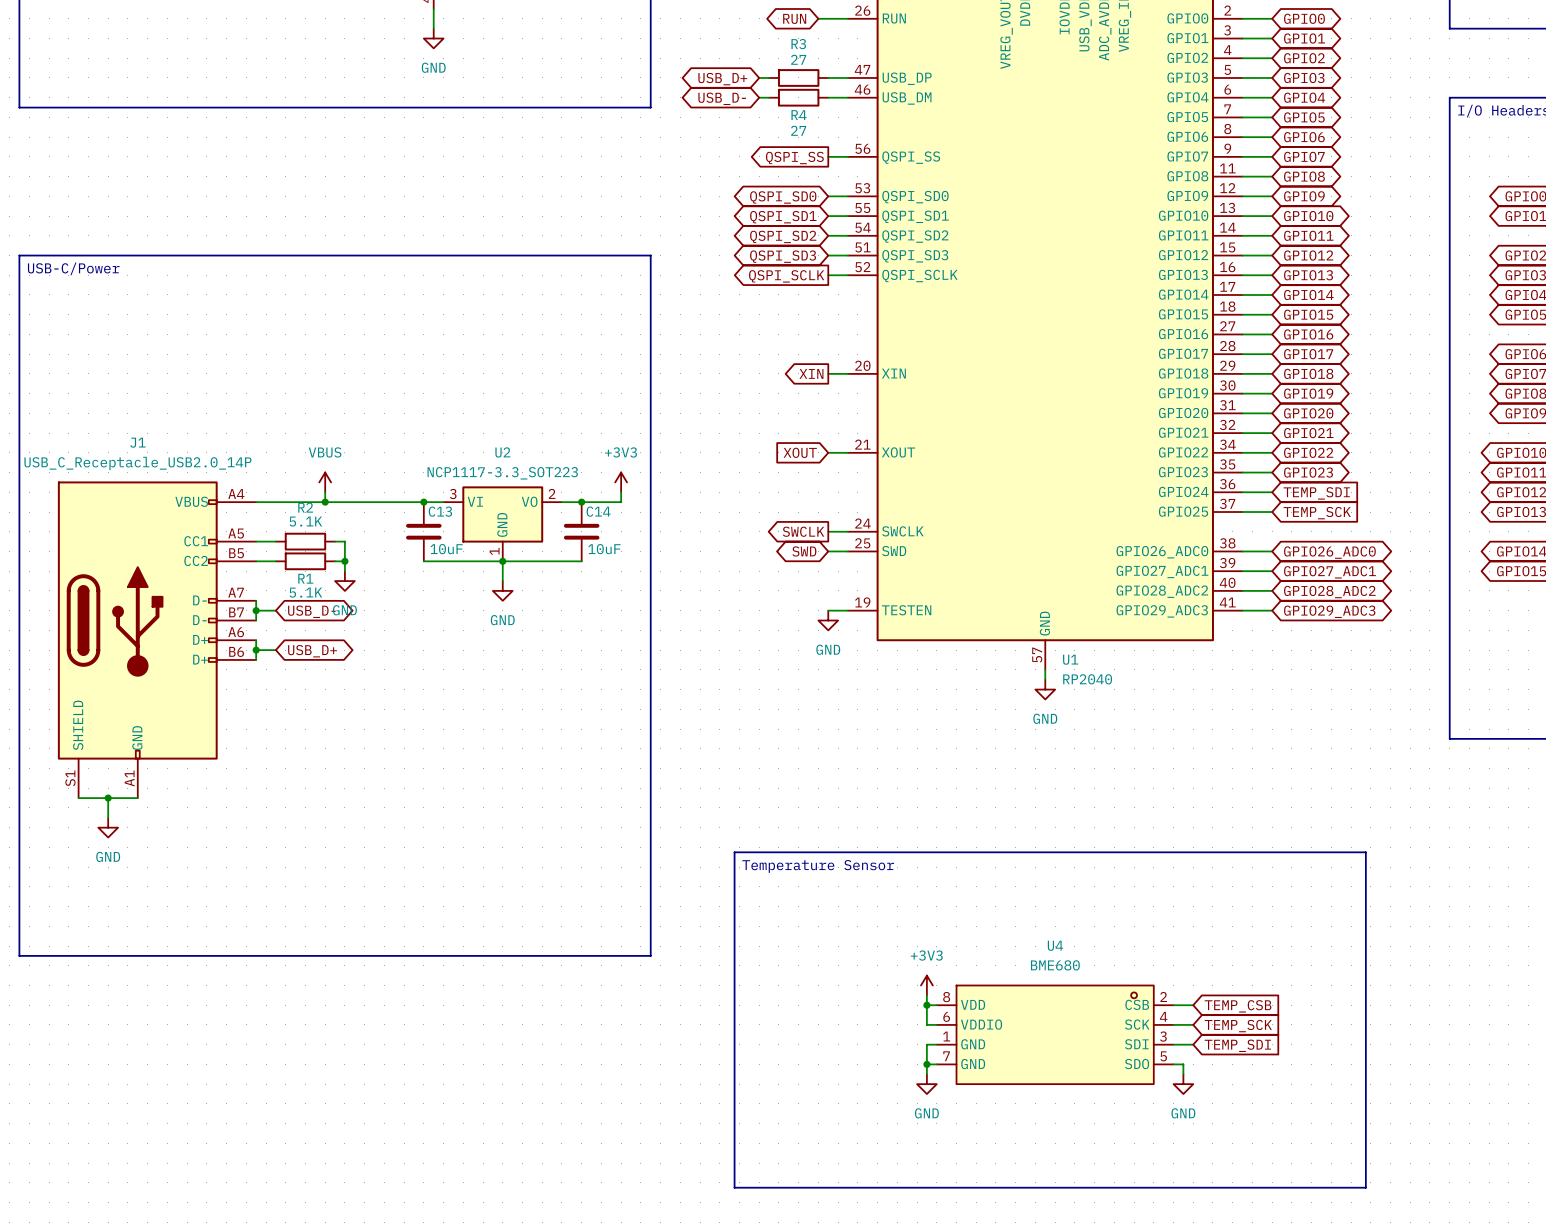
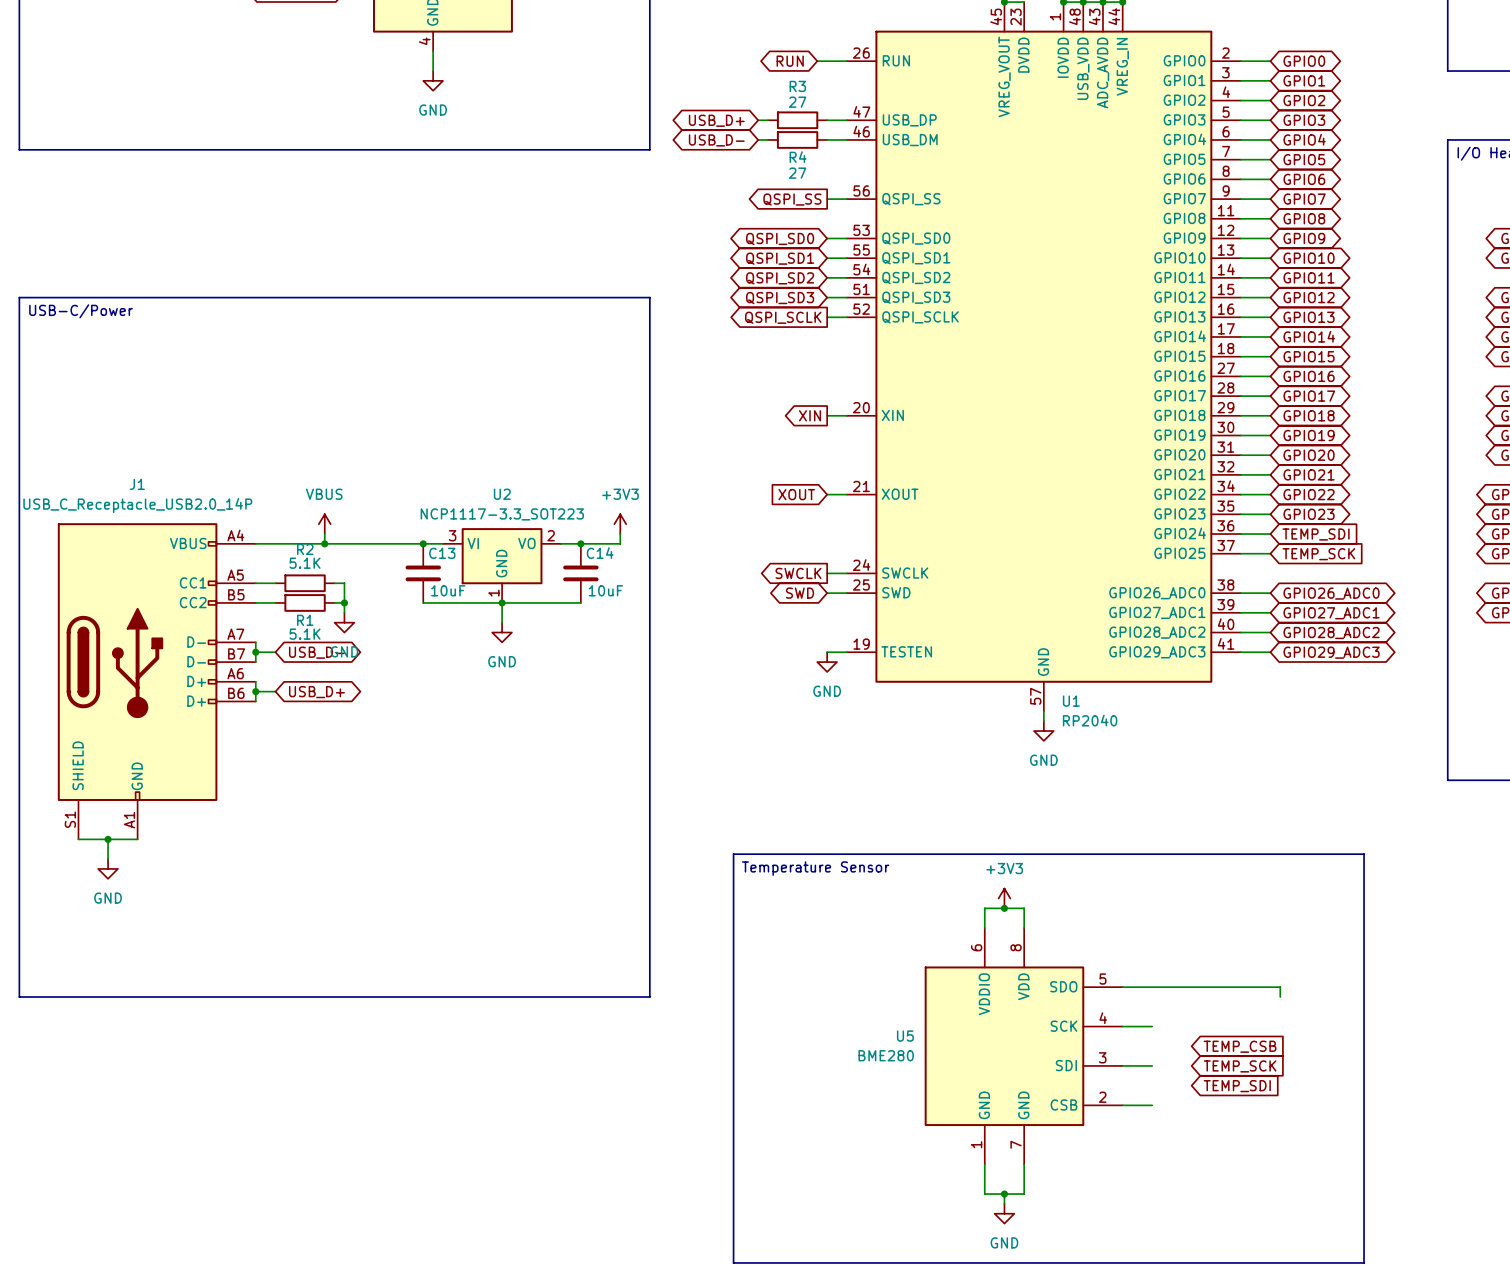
line: (734, 852) (1365, 852) -> (733, 893) (733, 854) (1364, 854) (1364, 893)
text position: Temperature Sensor (818, 866) -> Temperature Sensor (815, 868)
junction: none -> (1004, 908)
wire: none -> (984, 928) (984, 908) (1024, 908) (1024, 928)
wire: none -> (1122, 987) (1280, 987) (1280, 997)
power symbol position: +3V3 (926, 985) -> +3V3 (1004, 898)
junction: (926, 1005) -> none
U5: none -> BME280 (1023, 1046)
wire: (1173, 1005) (1193, 1005) -> none
wire: (1173, 1024) (1193, 1024) -> none
U4: BME680 (1055, 1034) -> none
wire: (1173, 1044) (1193, 1044) -> none
junction: (926, 1064) -> none
wire: (1173, 1064) (1183, 1064) (1183, 1074) -> none
power symbol: GND (926, 1084) -> none
power symbol: GND (1183, 1084) -> none
wire: none -> (984, 1164) (984, 1194) (1024, 1194) (1024, 1164)
wire: none -> (1004, 1194) (1004, 1203)
junction: none -> (1004, 1194)
power symbol: none -> GND (1004, 1213)
line: (734, 1187) (1365, 1187) -> (733, 1228) (733, 1262) (1364, 1262) (1364, 1228)

